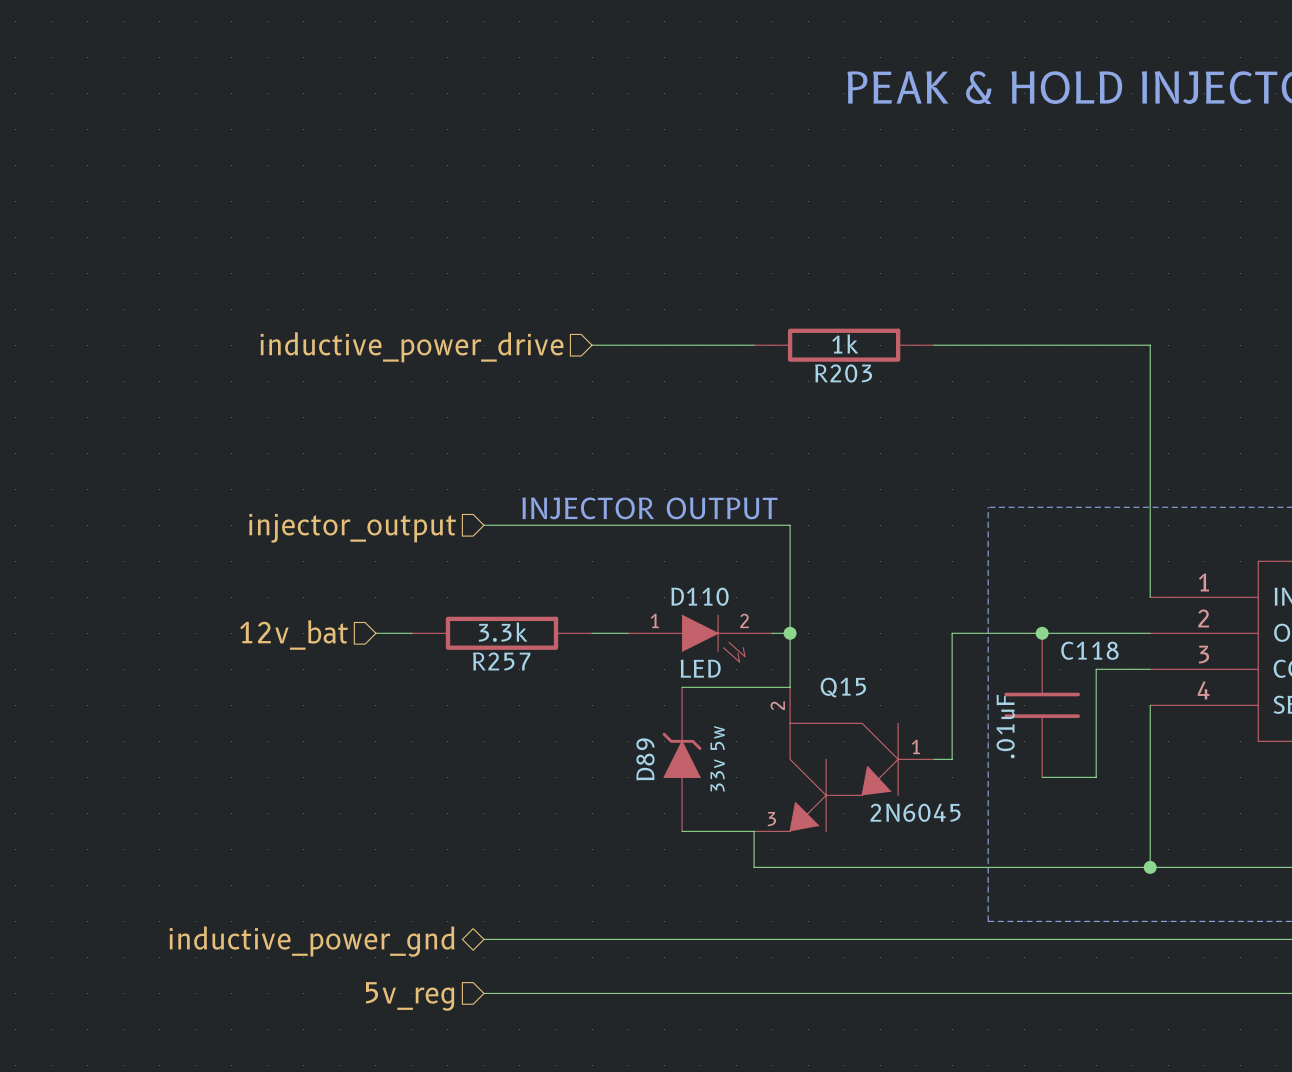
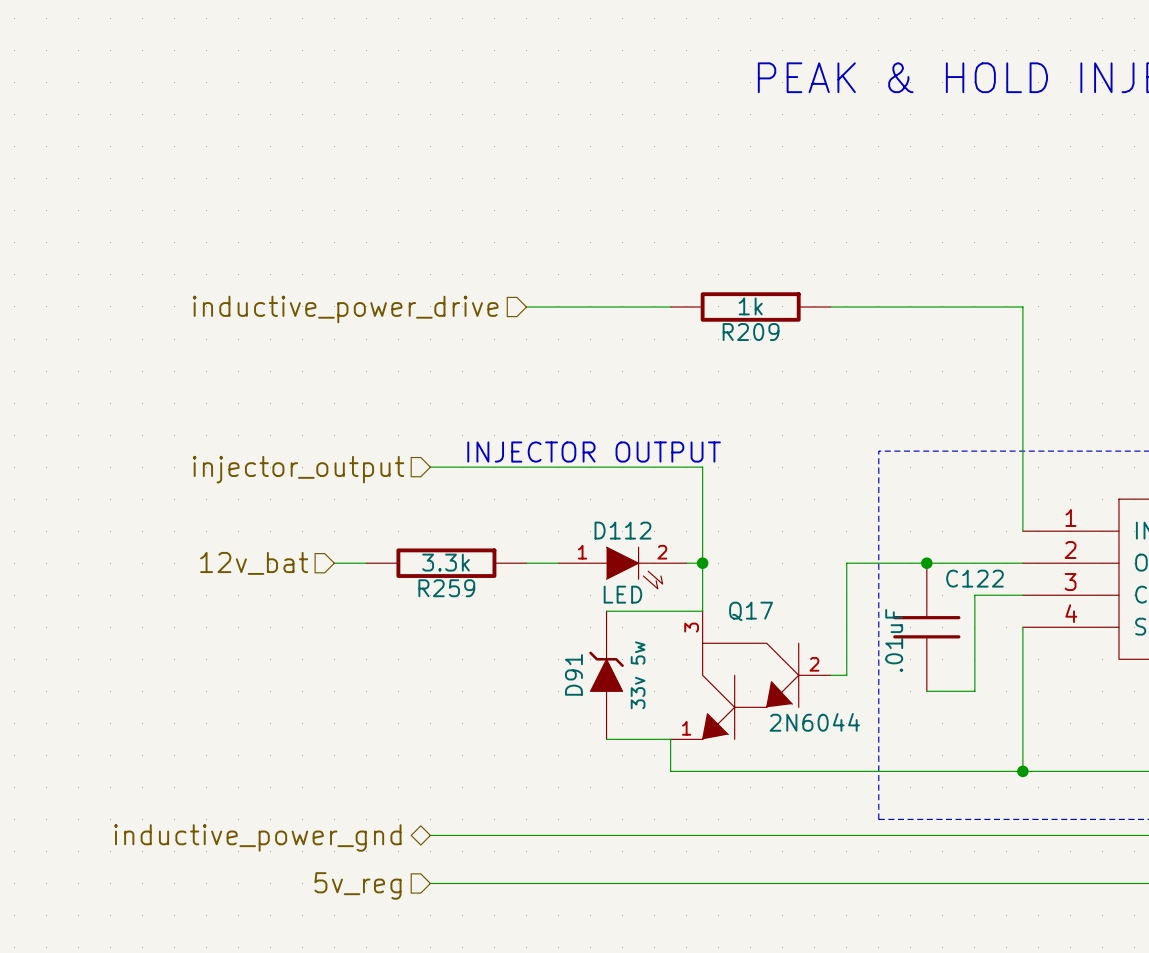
R203 name: R203 (843, 373) -> R209 (751, 332)
D110 name: D110 (699, 596) -> D112 (622, 530)
C118 name: C118 (1089, 650) -> C122 (974, 578)
R257 name: R257 (501, 661) -> R259 (446, 588)
Q15 name: Q15 (843, 687) -> Q17 (751, 611)
Q15 pin number: 2 (777, 705) -> 3 (691, 627)
Q15 pin number: 1 (915, 746) -> 2 (814, 664)
D89 name: D89 (645, 759) -> D91 (573, 674)
Q15 value: 2N6045 (915, 812) -> 2N6044 (814, 722)
Q15 pin number: 3 (771, 819) -> 1 (686, 728)

